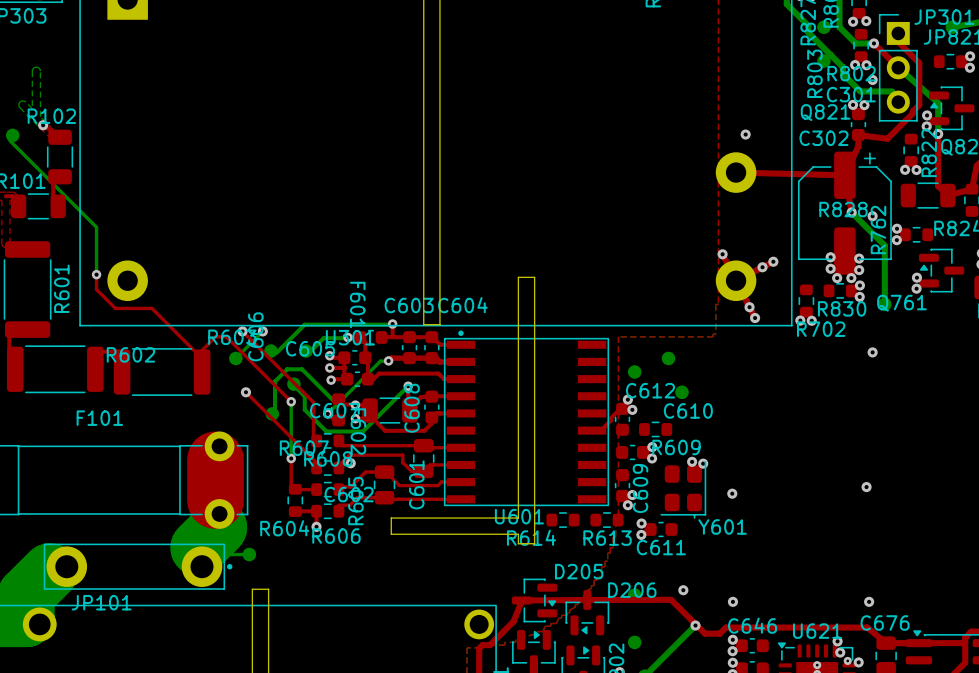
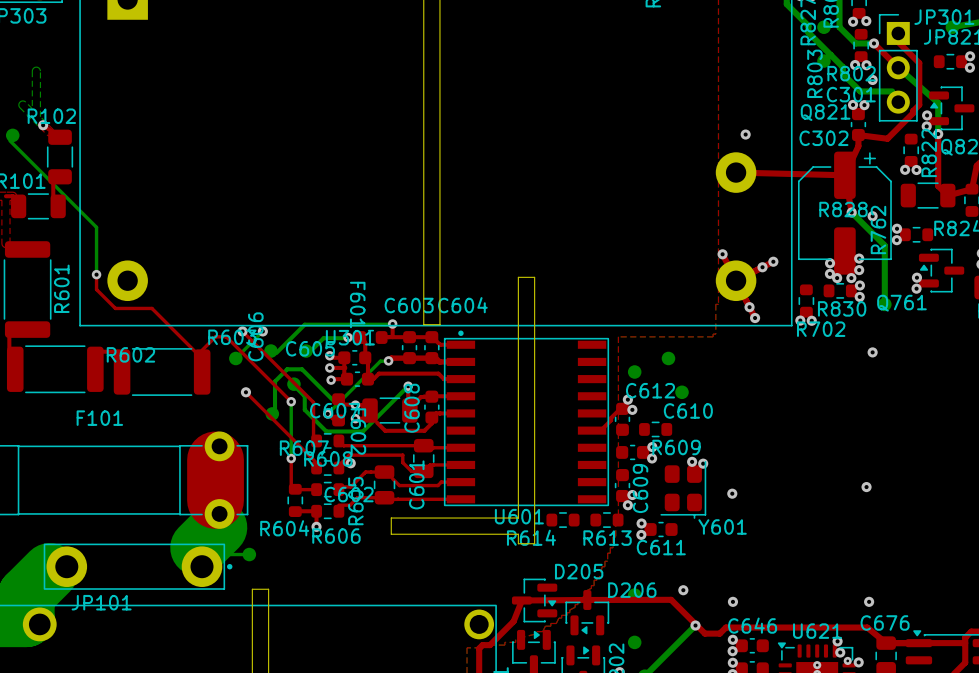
via: (830, 257) -> none
via: none -> (830, 263)
via: (830, 268) -> none
via: none -> (829, 273)

